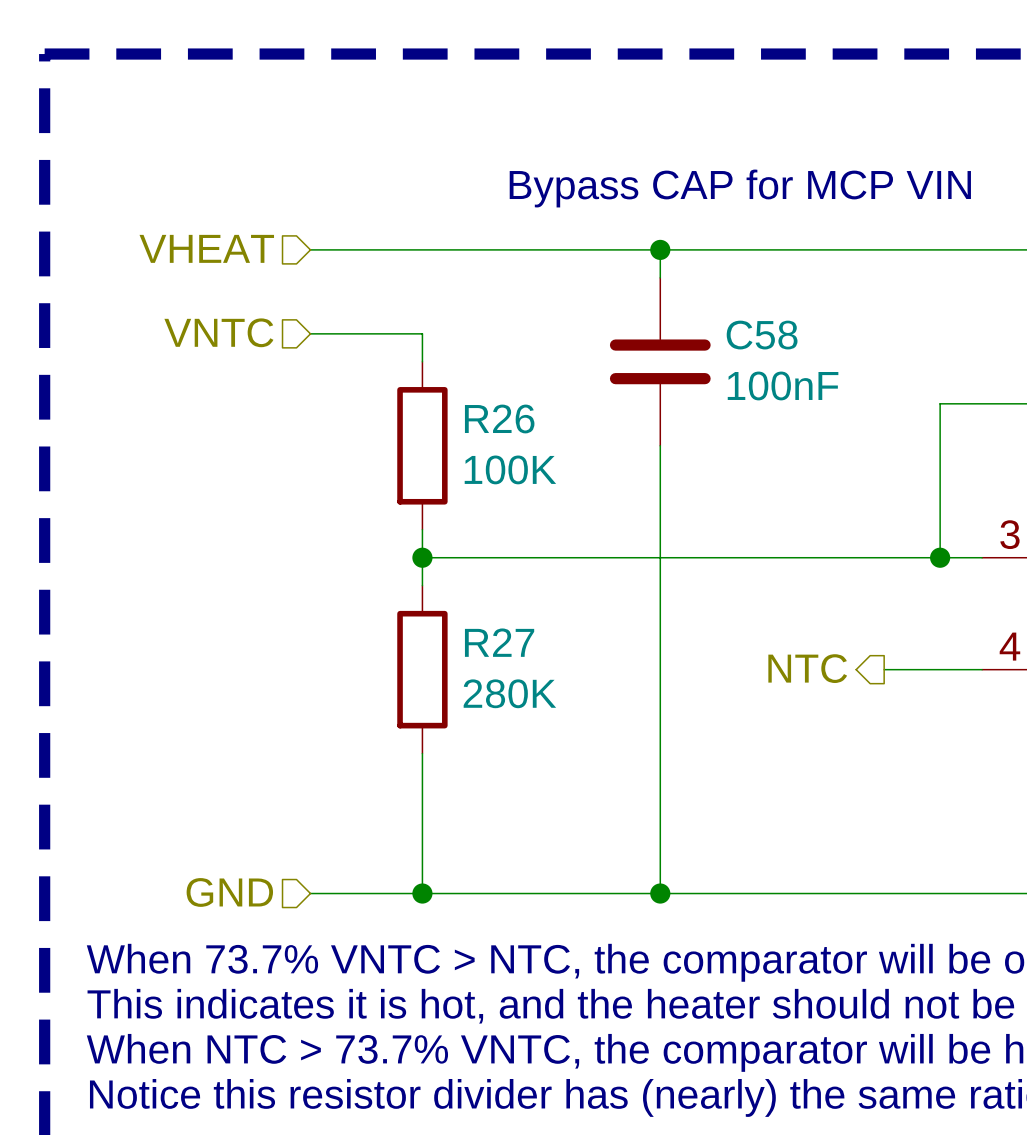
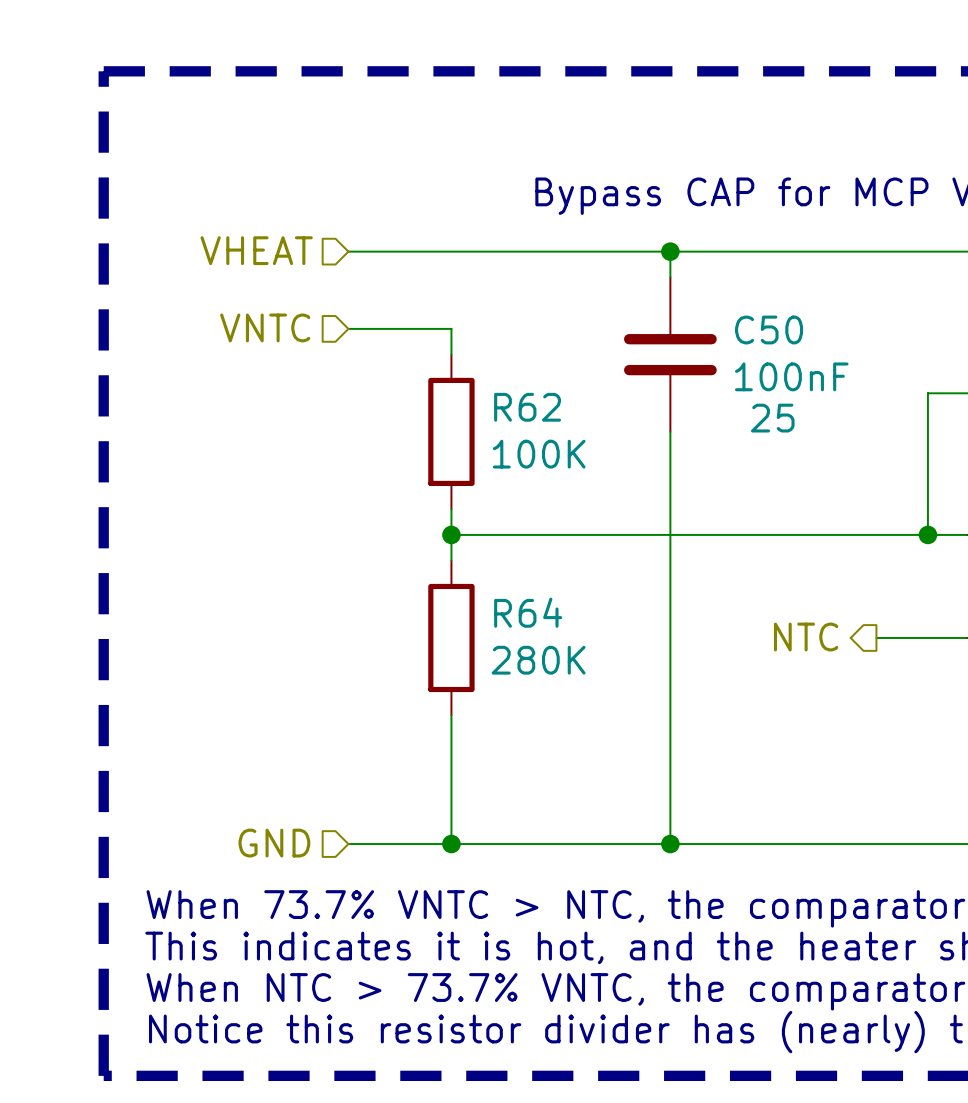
C58 name: C58 (762, 335) -> C50 (769, 329)
R26 name: R26 (499, 419) -> R62 (527, 407)
C58 text: none -> 25 (772, 418)
R27 name: R27 (499, 642) -> R64 (528, 612)

